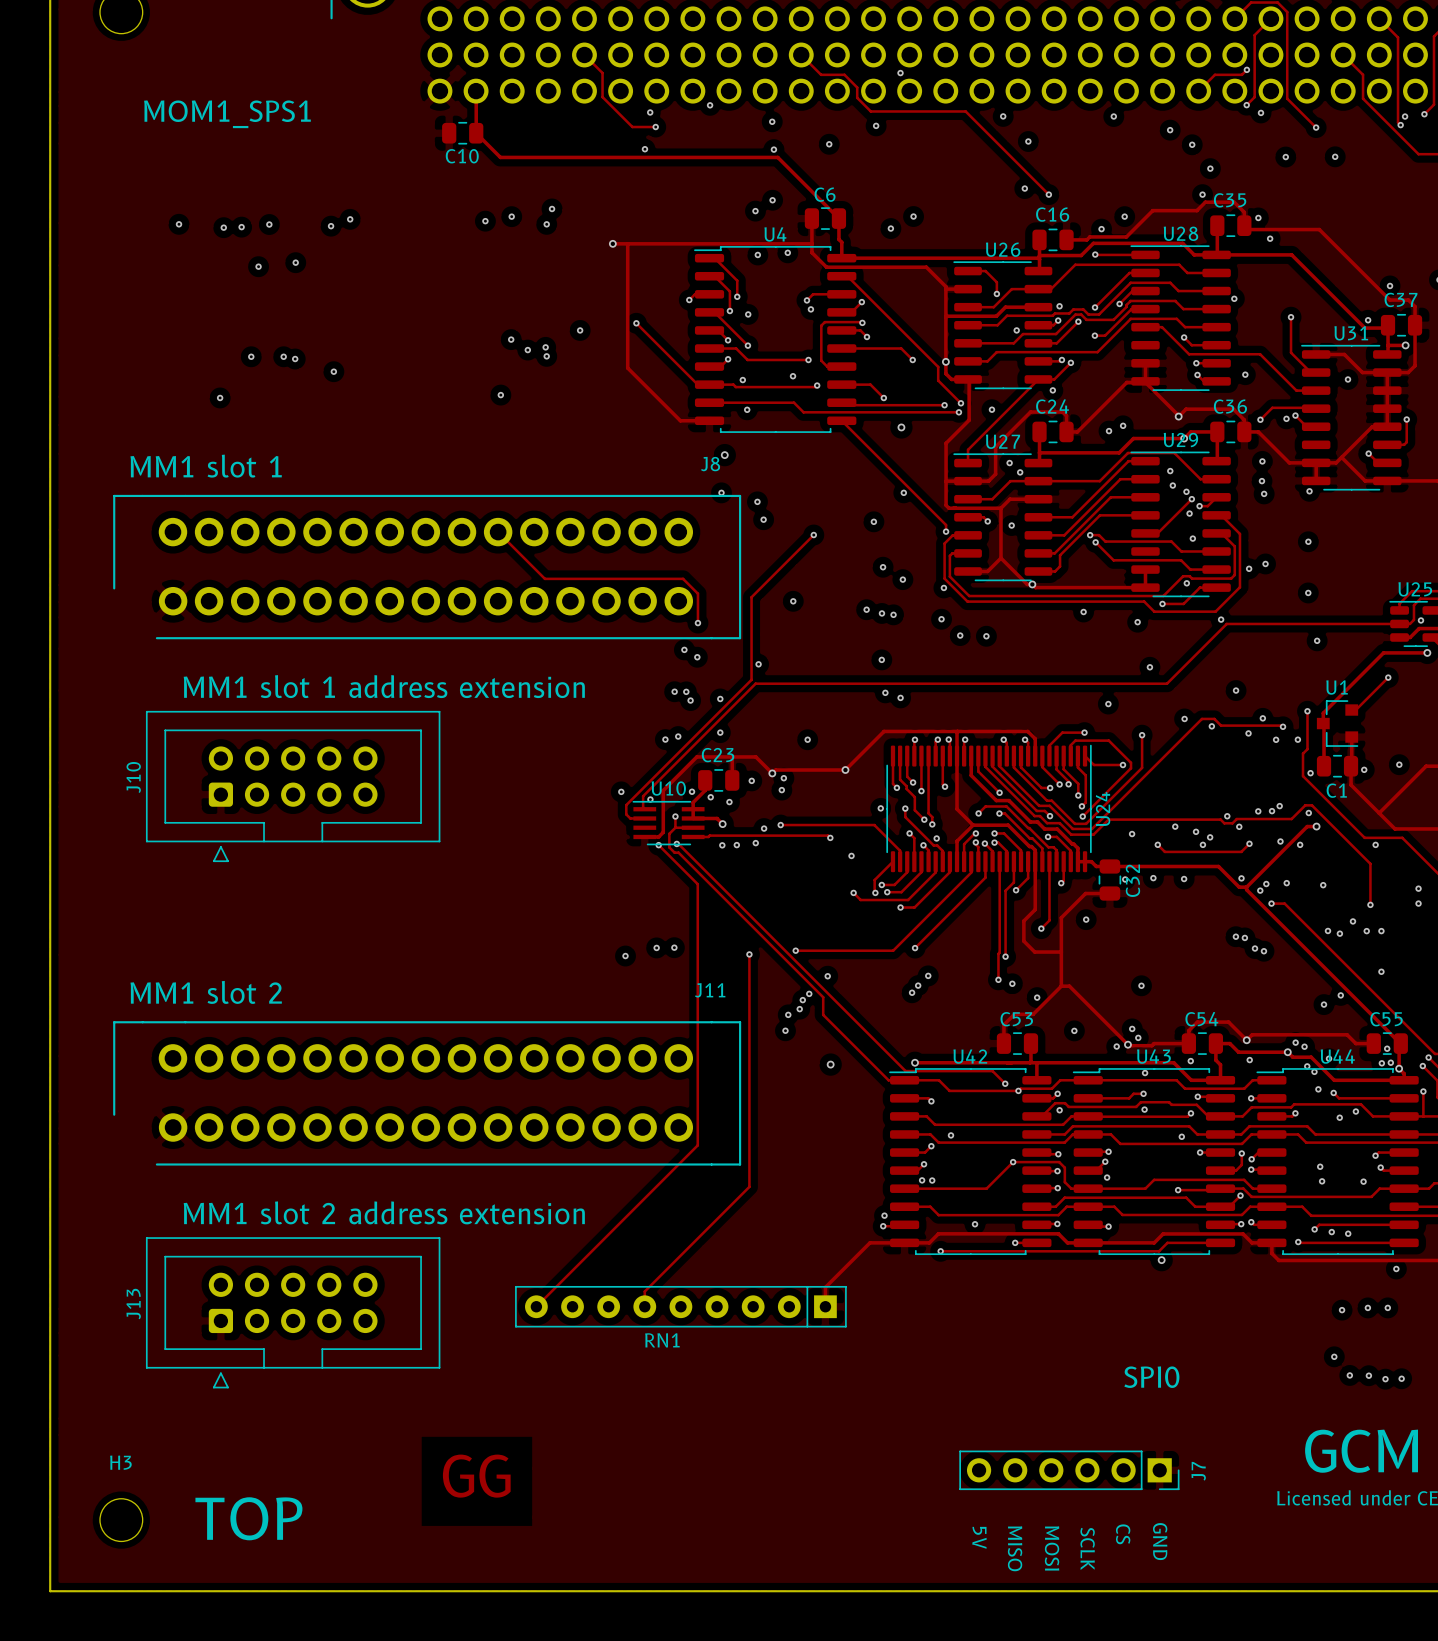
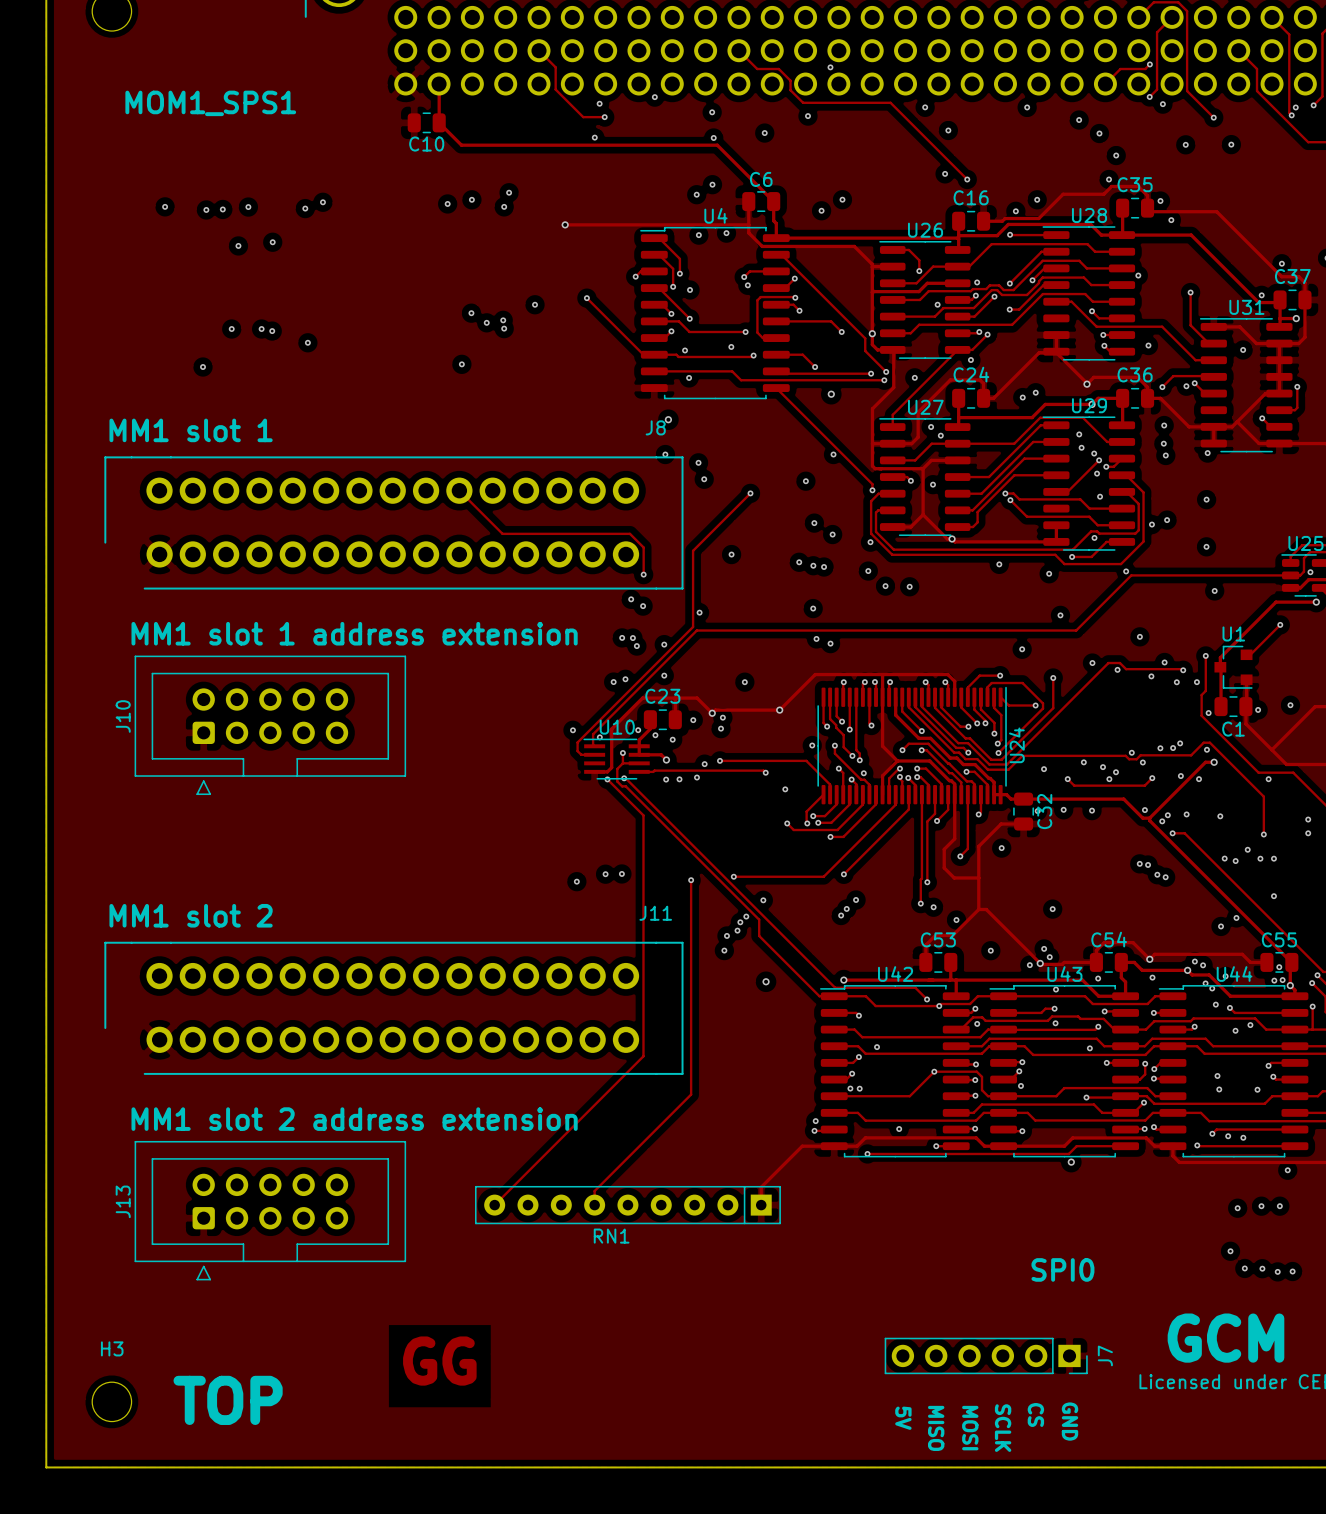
track: (627, 243) (627, 368) (680, 420) (709, 420) -> none

